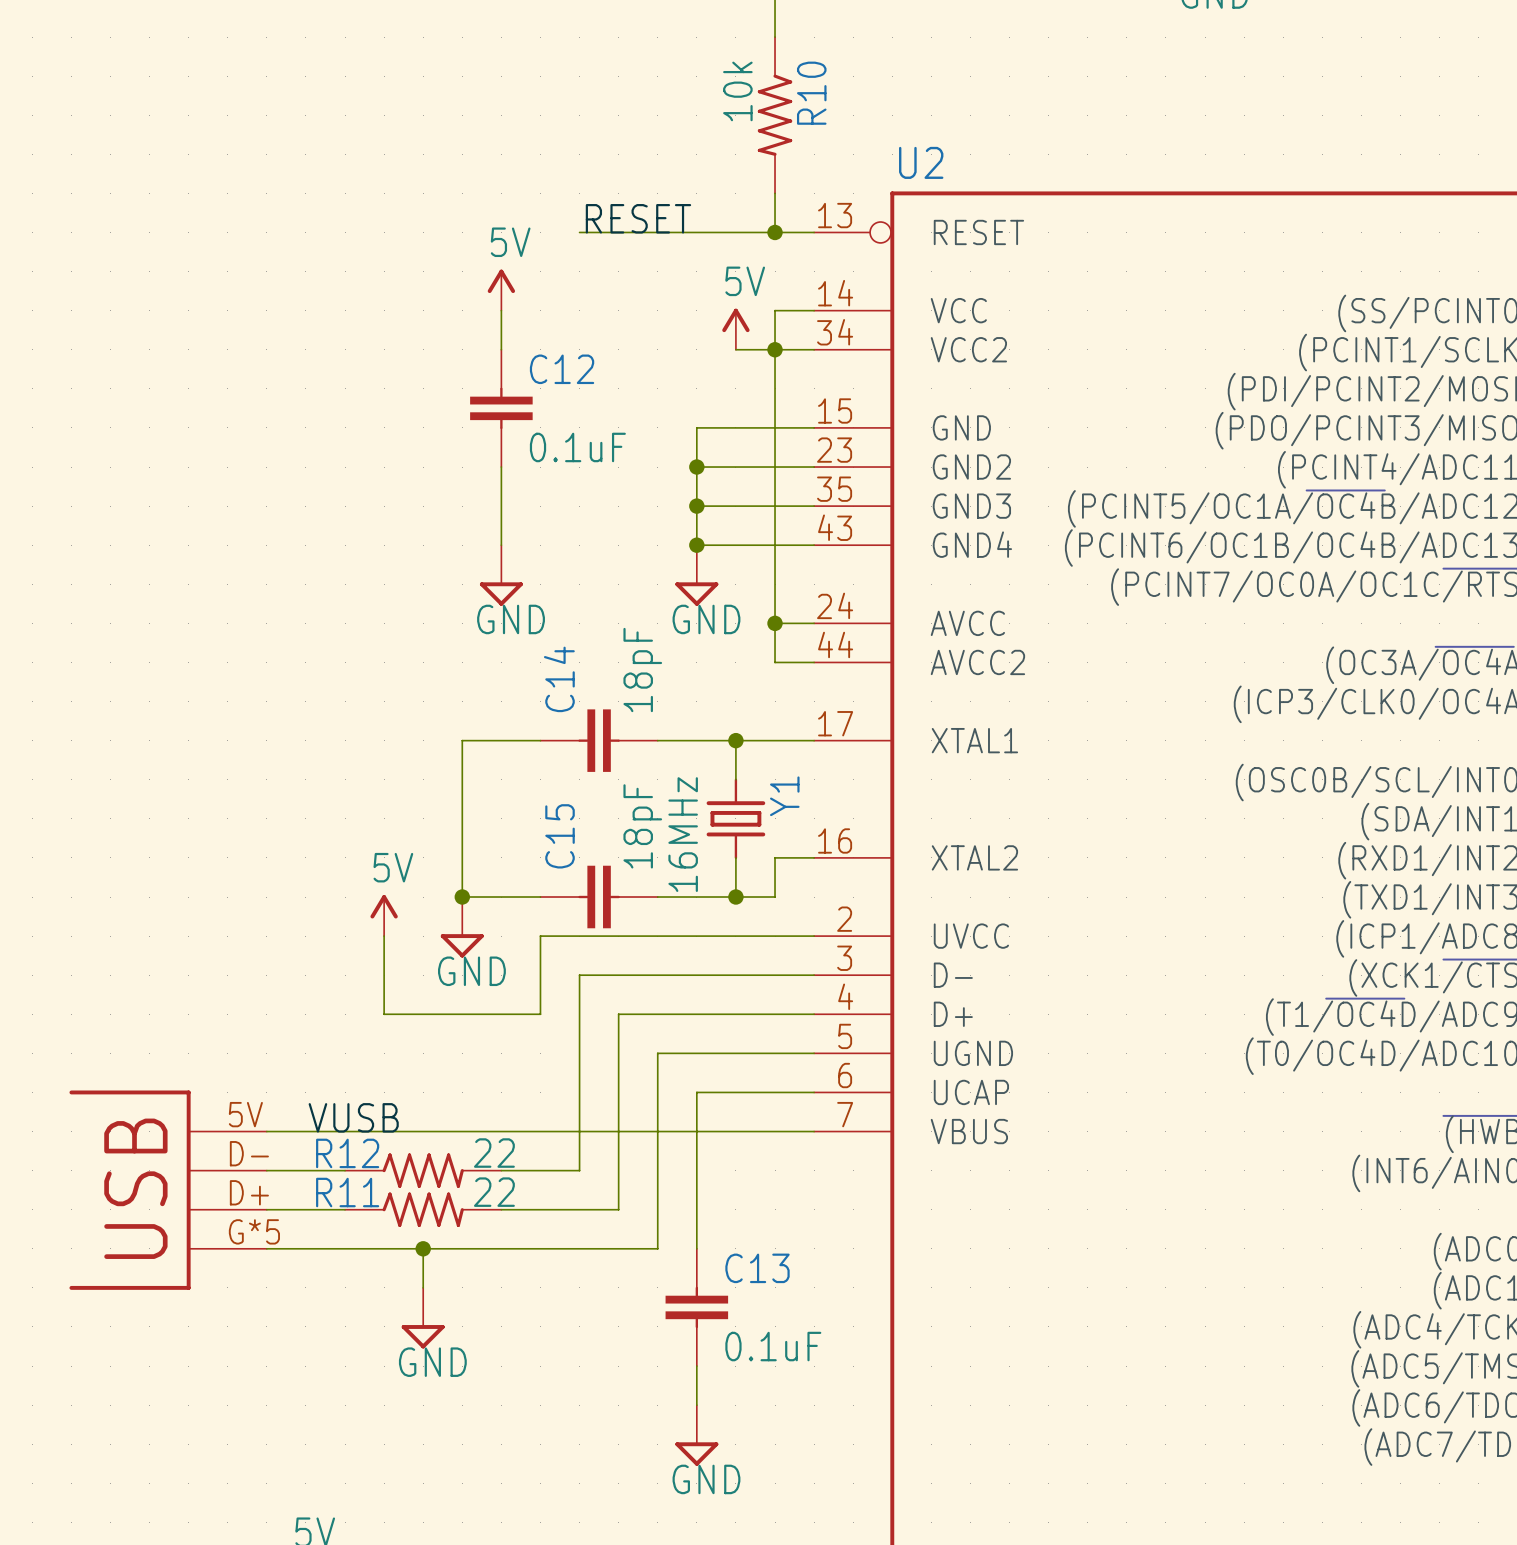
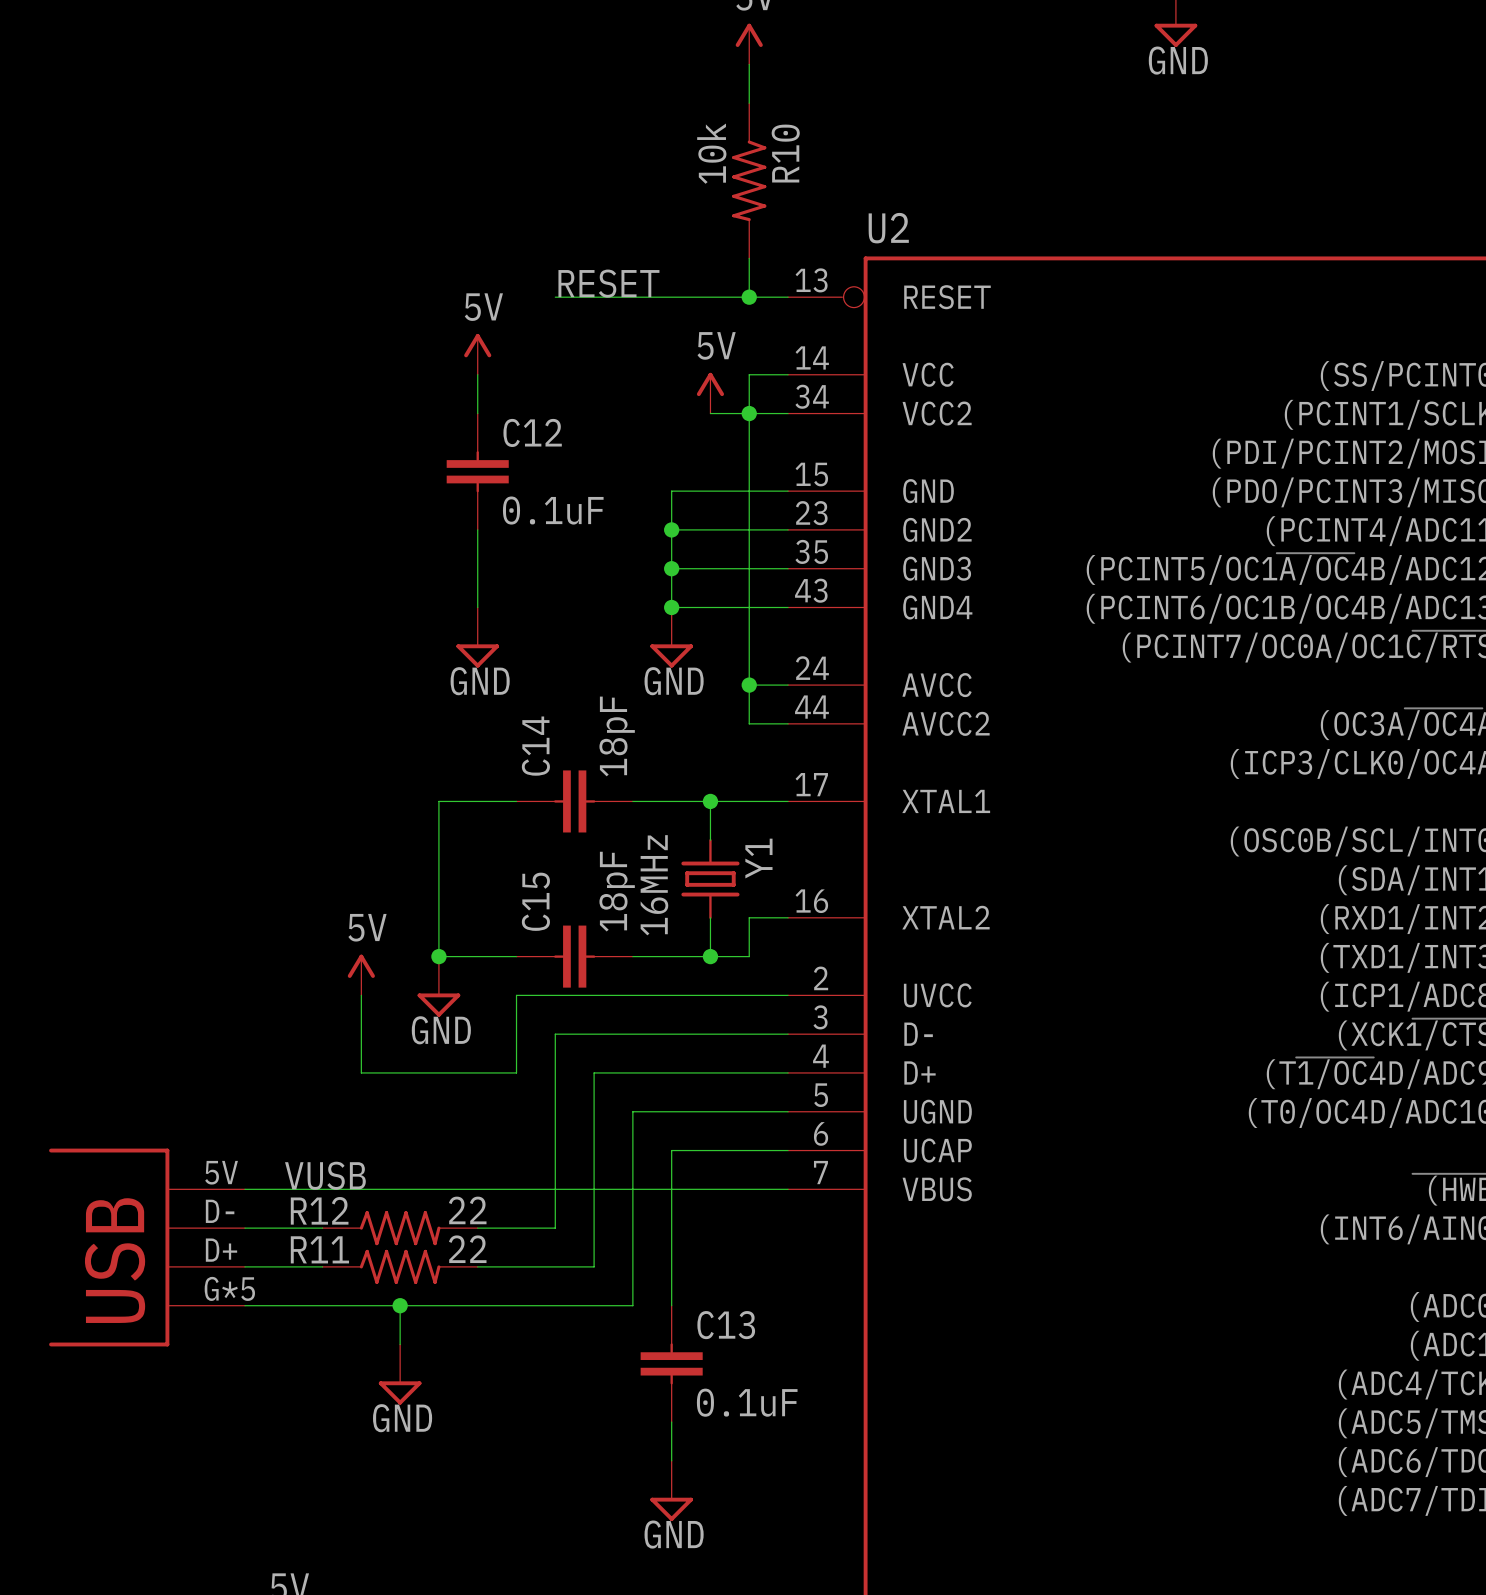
Y1 value position: 16MHz (683, 834) -> 16MHz (654, 885)

